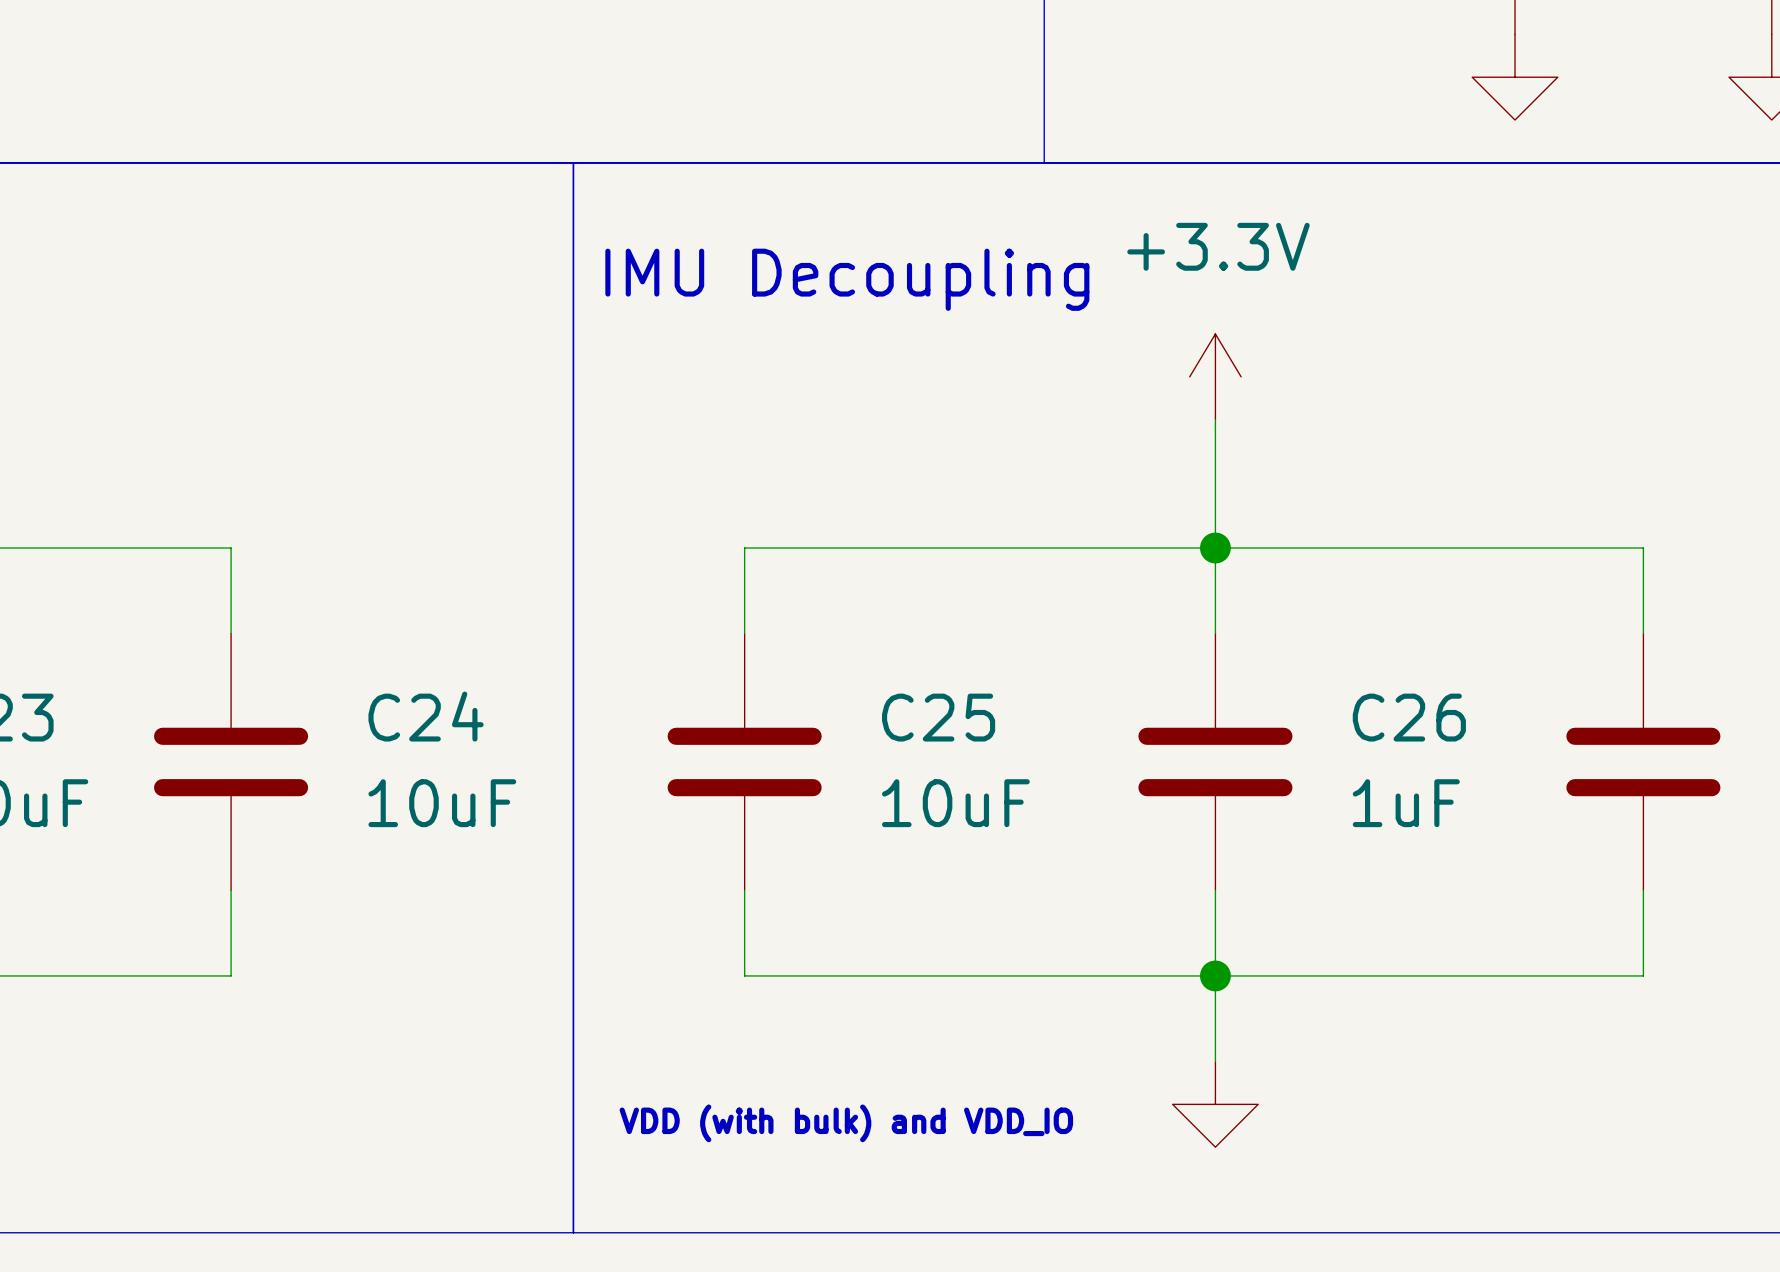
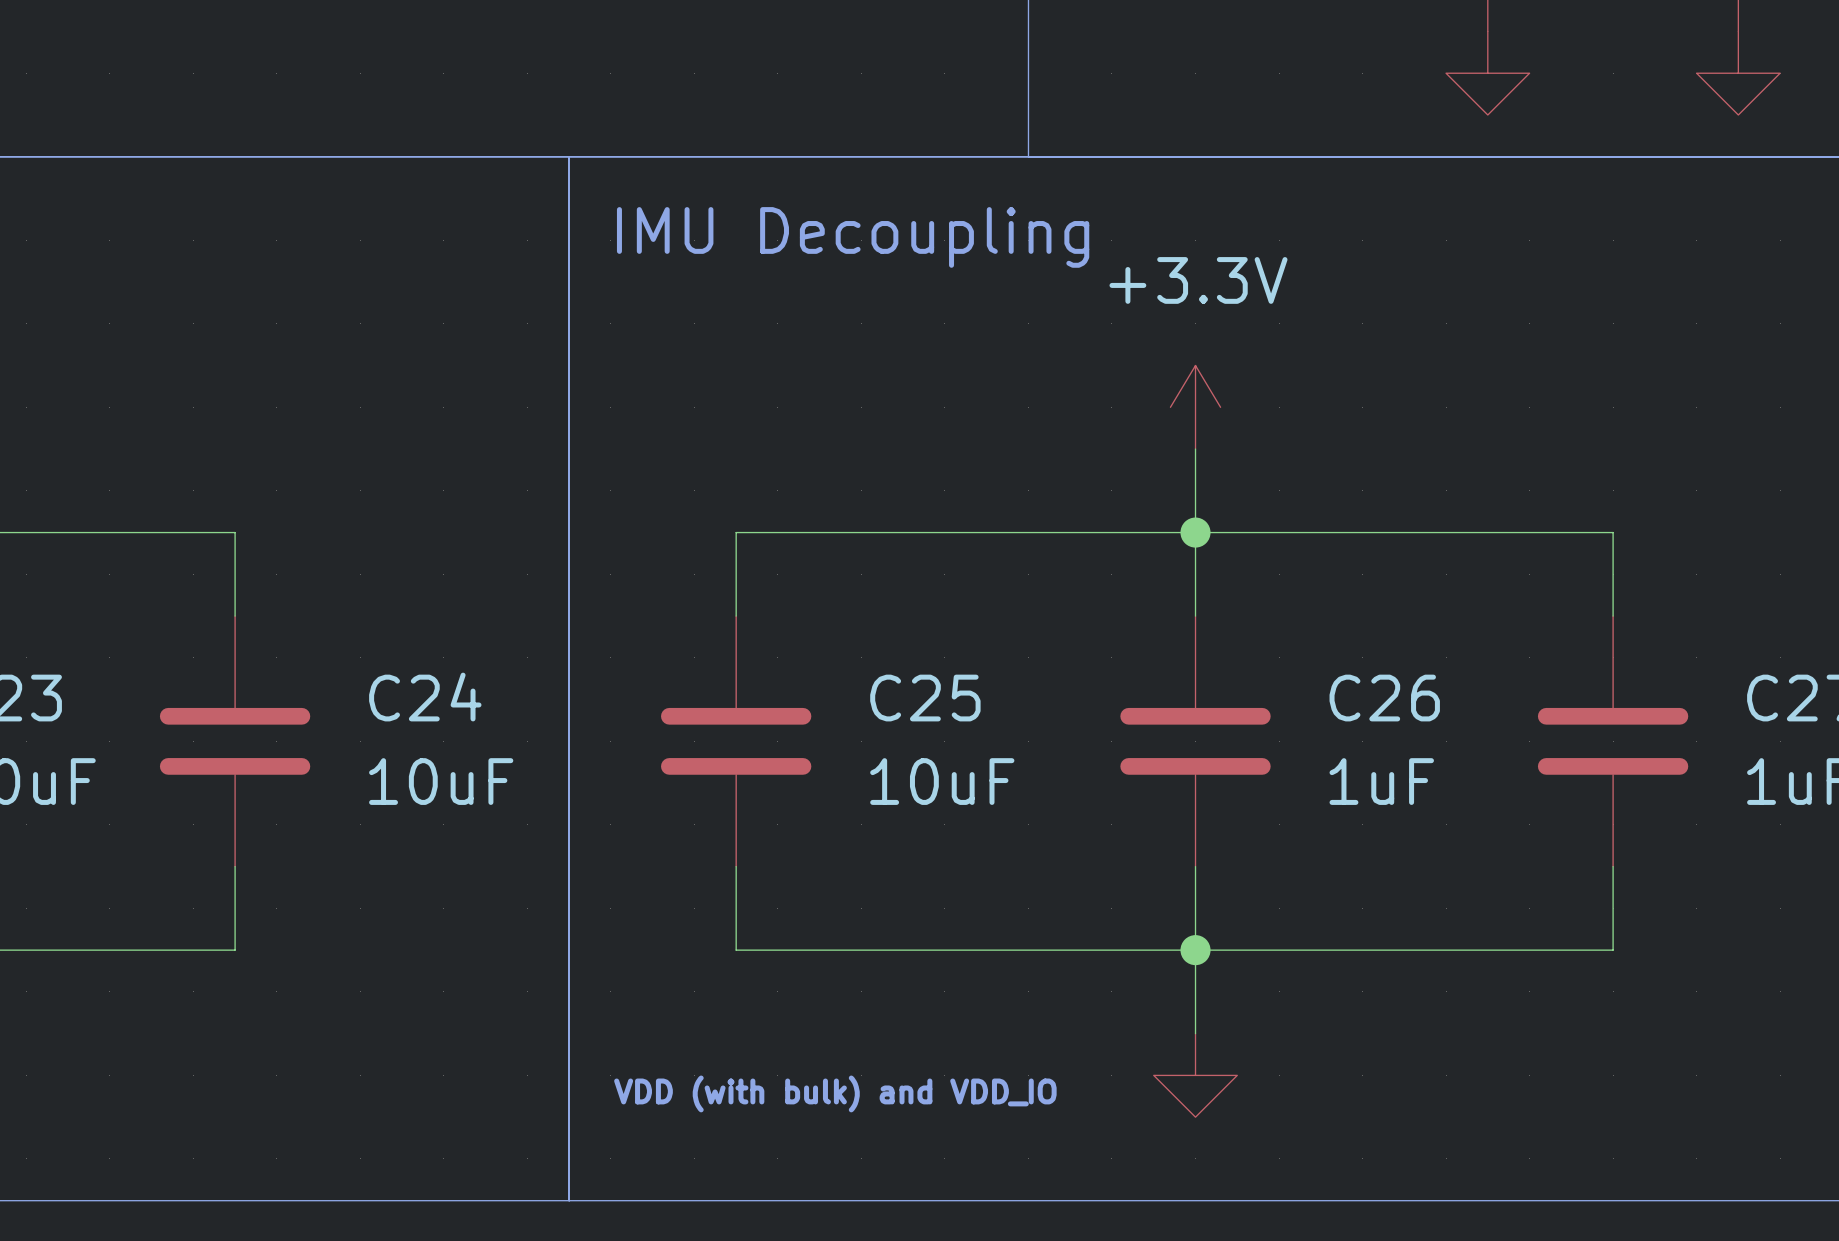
text position: IMU Decoupling (847, 279) -> IMU Decoupling (853, 237)
power symbol position: +3.3V (1215, 376) -> +3.3V (1195, 407)

